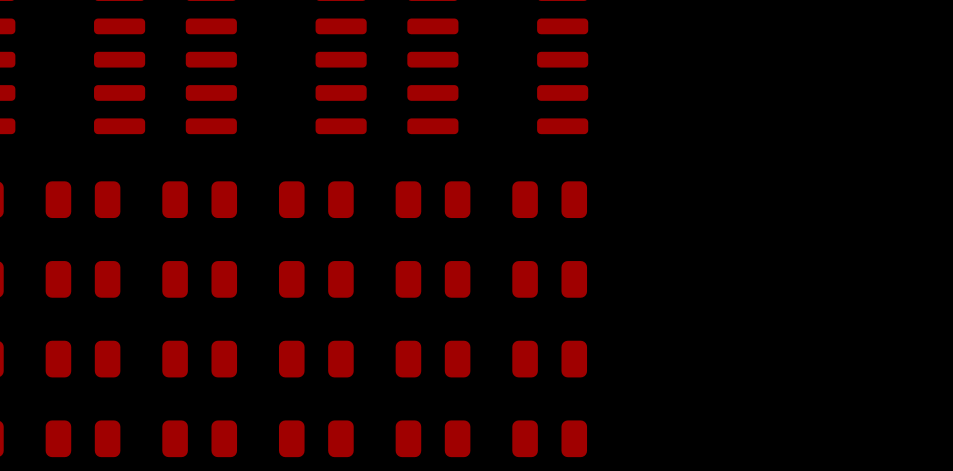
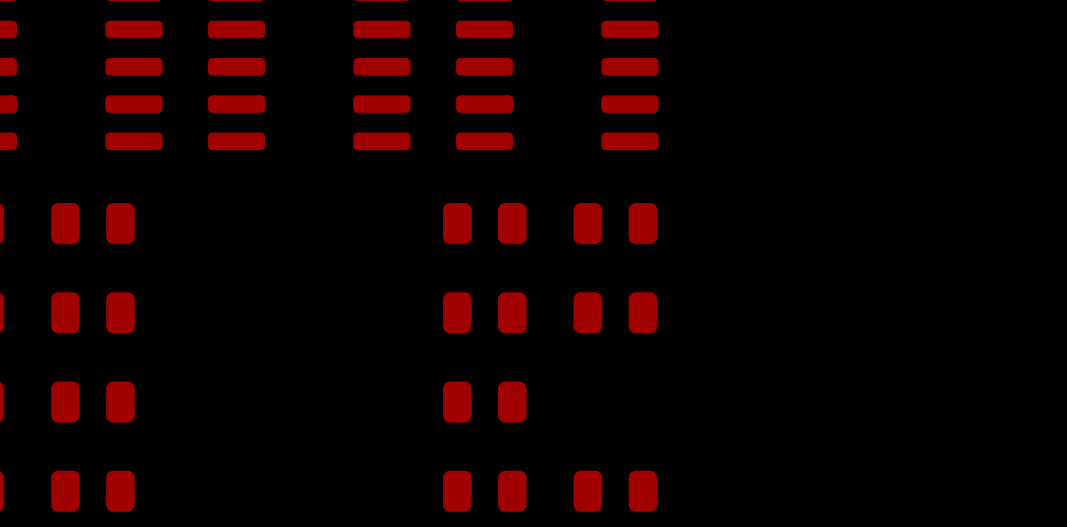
part: (199, 199) -> none
part: (316, 199) -> none
part: (199, 279) -> none
part: (316, 279) -> none
part: (199, 359) -> none
part: (316, 359) -> none
part: (549, 359) -> none
part: (199, 438) -> none
part: (316, 438) -> none

